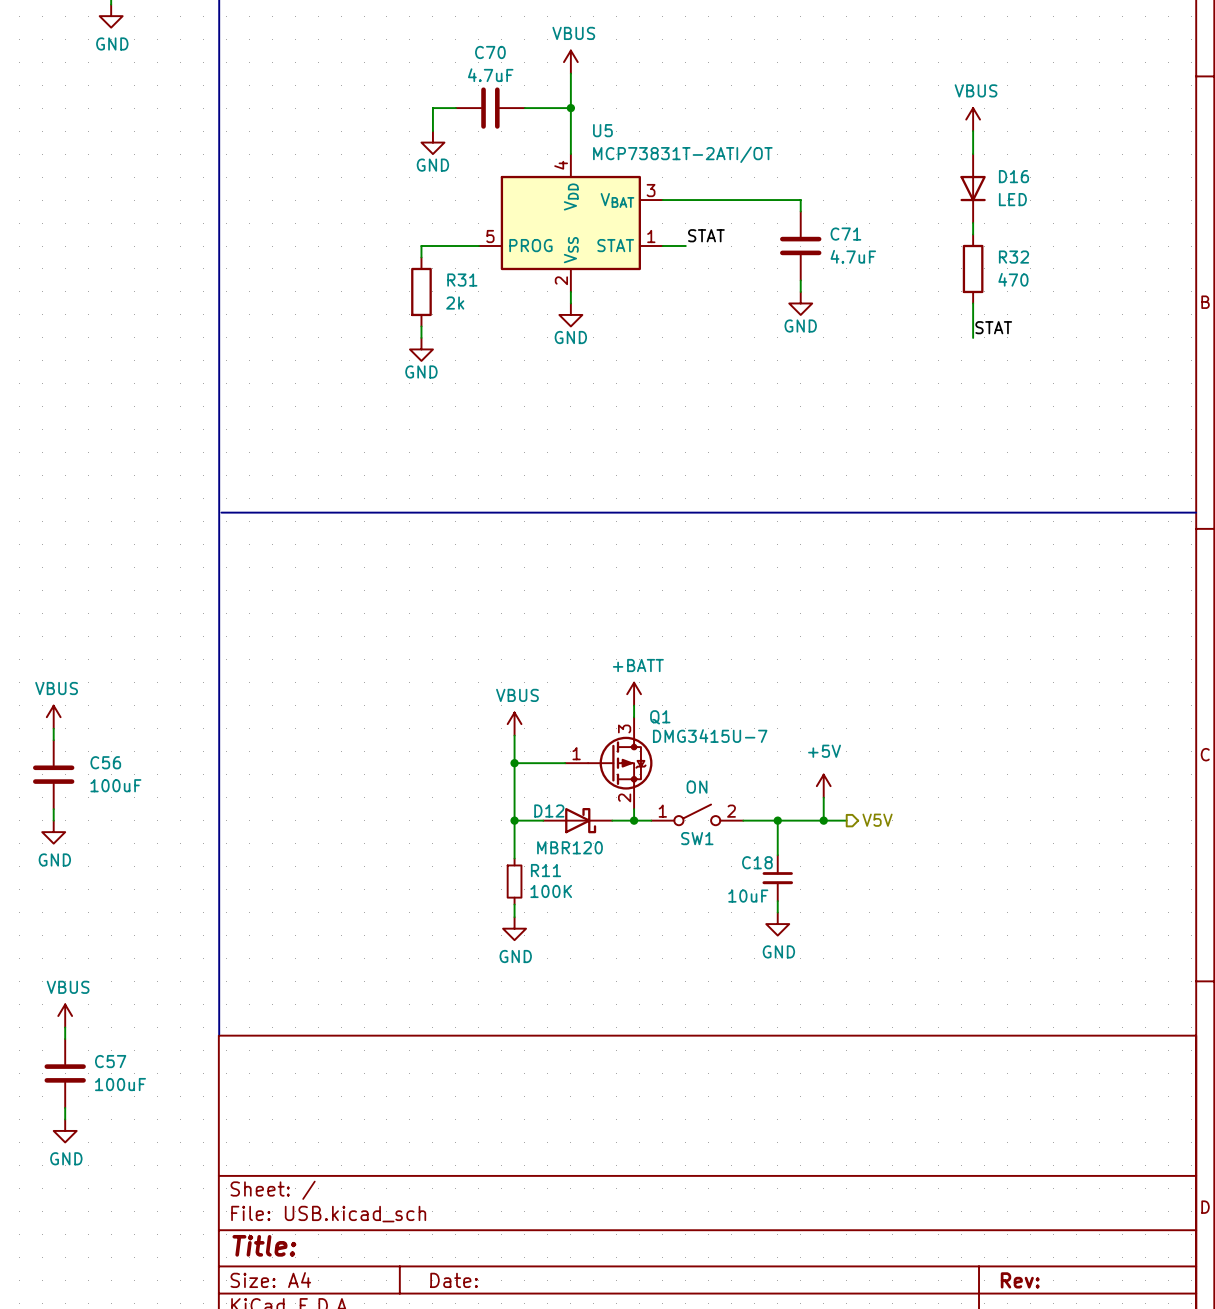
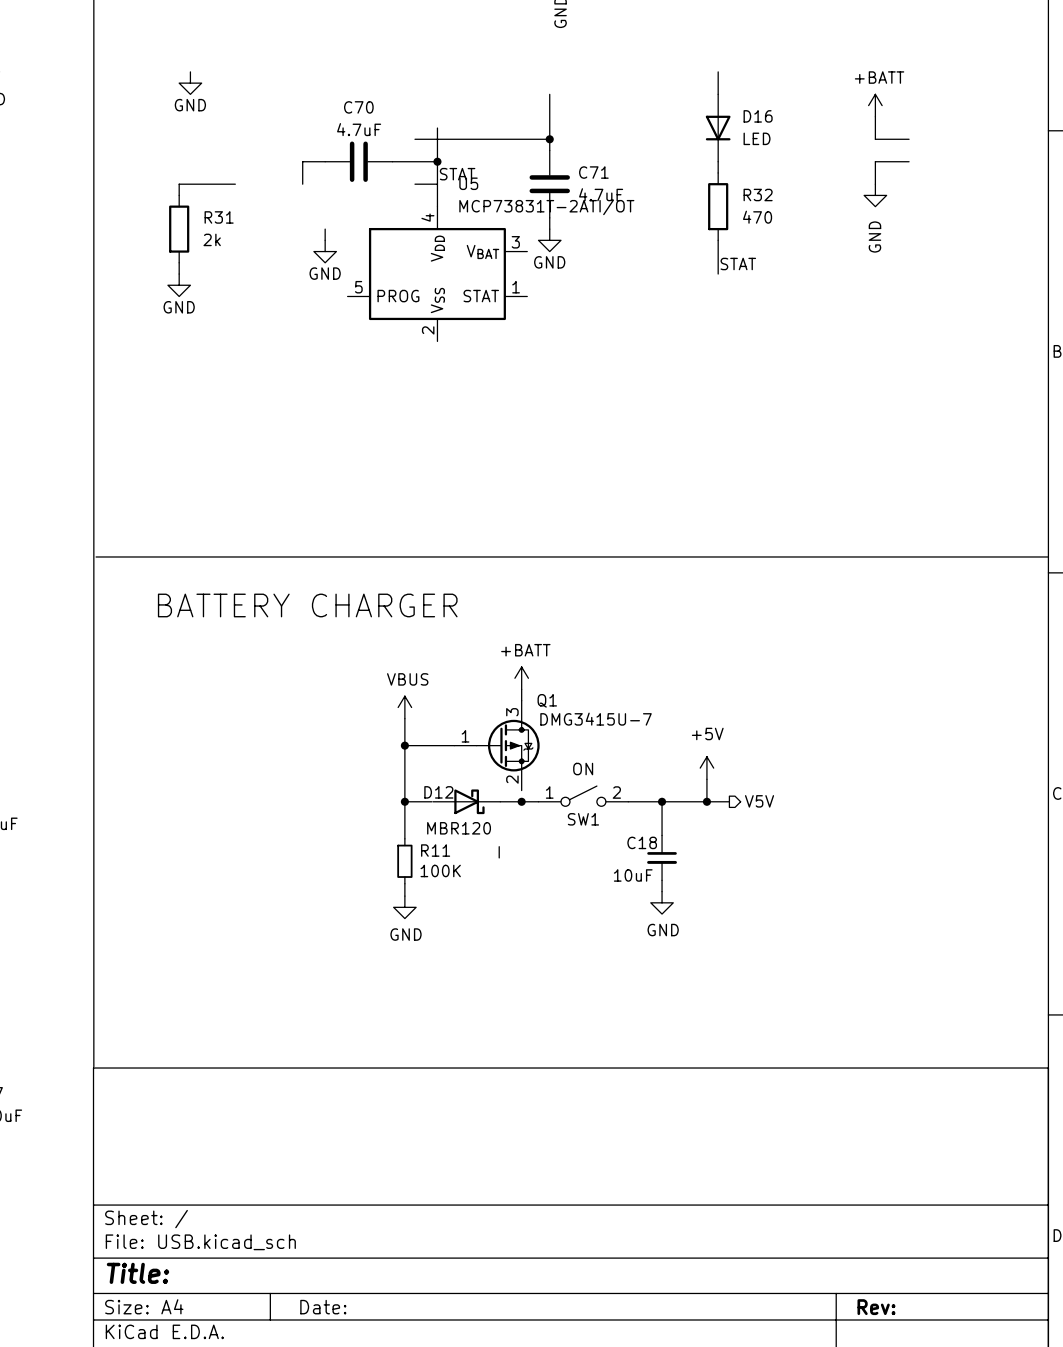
power symbol: none -> GND (190, 83)
wire: none -> (549, 94) (549, 150)
power symbol: none -> +BATT (875, 105)
power symbol: VBUS (570, 62) -> none
wire: none -> (875, 116) (875, 139) (909, 139)
wire: none -> (414, 139) (549, 139)
junction: none -> (549, 139)
wire: none -> (909, 161) (875, 161) (875, 184)
power symbol: VBUS (973, 119) -> none
label: none -> STAT (457, 174)
wire: (973, 131) (973, 154) -> (718, 71) (718, 94)
power symbol position: GND (432, 142) -> GND (325, 251)
power symbol: none -> GND (875, 195)
power symbol: none -> GND (549, 240)
D16 position: (973, 188) -> (718, 128)
wire: (662, 200) (800, 200) (800, 211) -> none
label: none -> STAT (738, 264)
wire: (973, 223) (973, 234) -> (718, 161) (718, 172)
power symbol: none -> GND (179, 285)
label: STAT (706, 235) -> none
wire: (478, 246) (421, 246) (421, 257) -> (235, 184) (179, 184) (179, 195)
wire: (662, 246) (685, 246) -> (414, 184) (437, 184)
C71 position: (800, 246) -> (549, 184)
R32 position: (973, 268) -> (718, 206)
wire: (800, 280) (800, 291) -> (549, 217) (549, 229)
R31 position: (421, 291) -> (179, 229)
wire: (570, 291) (570, 303) -> (325, 229) (325, 240)
power symbol: GND (800, 303) -> none
wire: (973, 303) (973, 337) -> (718, 240) (718, 274)
power symbol: GND (570, 314) -> none
wire: (421, 326) (421, 337) -> (179, 262) (179, 274)
label: STAT (993, 327) -> none
power symbol: GND (421, 349) -> none
text: none -> BATTERY CHARGER (307, 605)
power symbol position: +BATT (634, 694) -> +BATT (521, 678)
wire: none -> (404, 745) (454, 745)
junction: none -> (404, 745)
wire: (634, 705) (634, 717) -> (521, 689) (521, 700)
power symbol position: VBUS (514, 724) -> VBUS (404, 707)
wire: (514, 735) (514, 858) -> (404, 718) (404, 838)
wire: (514, 763) (537, 763) -> none
junction position: (514, 763) -> (404, 801)
Q1 position: (608, 763) -> (496, 745)
junction: none -> (521, 801)
junction: none -> (662, 801)
junction: none -> (706, 801)
power symbol position: +5V (823, 786) -> +5V (706, 768)
wire: (823, 797) (823, 820) -> (706, 779) (706, 801)
SW1 position: (697, 814) -> (583, 796)
wire: (514, 820) (543, 820) -> none
junction: (514, 820) -> none
D12 position: (577, 820) -> (466, 801)
wire: (612, 820) (651, 820) -> (500, 801) (538, 801)
junction: (634, 820) -> none
wire: (743, 820) (846, 820) -> (628, 801) (729, 801)
wire: (777, 820) (777, 855) -> (662, 801) (662, 835)
junction: (777, 820) -> none
junction: (823, 820) -> none
hierarchical label position: V5V (877, 820) -> V5V (759, 801)
C18 position: (777, 878) -> (662, 857)
R11 position: (514, 881) -> (404, 861)
wire: (777, 901) (777, 912) -> (662, 880) (662, 891)
wire: (514, 904) (514, 917) -> (404, 883) (404, 896)
power symbol position: GND (777, 924) -> GND (662, 902)
power symbol position: GND (514, 928) -> GND (404, 907)

